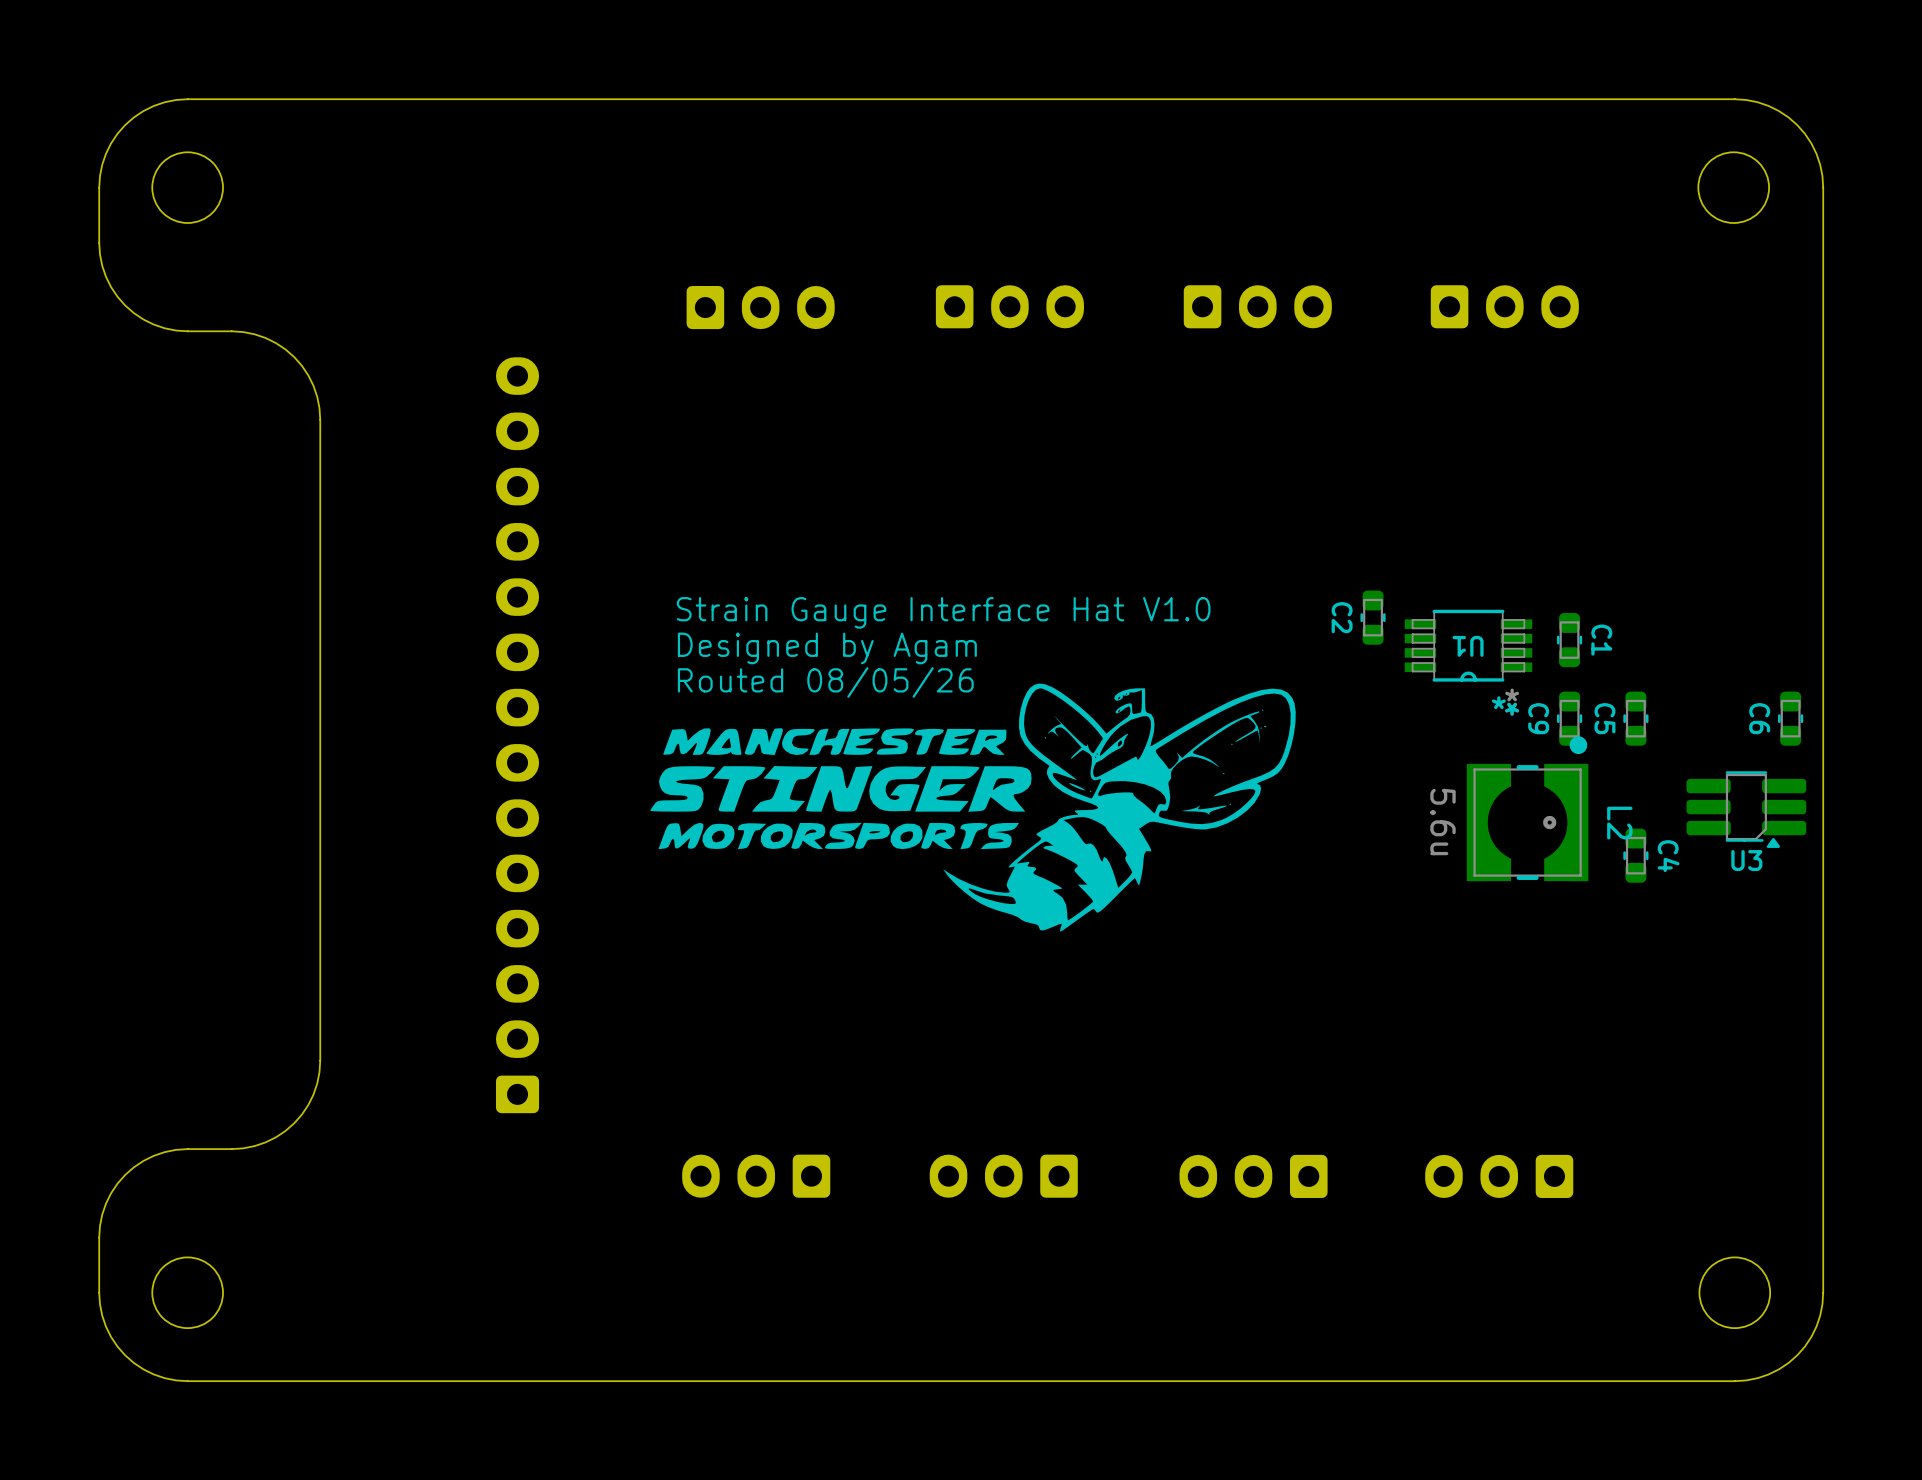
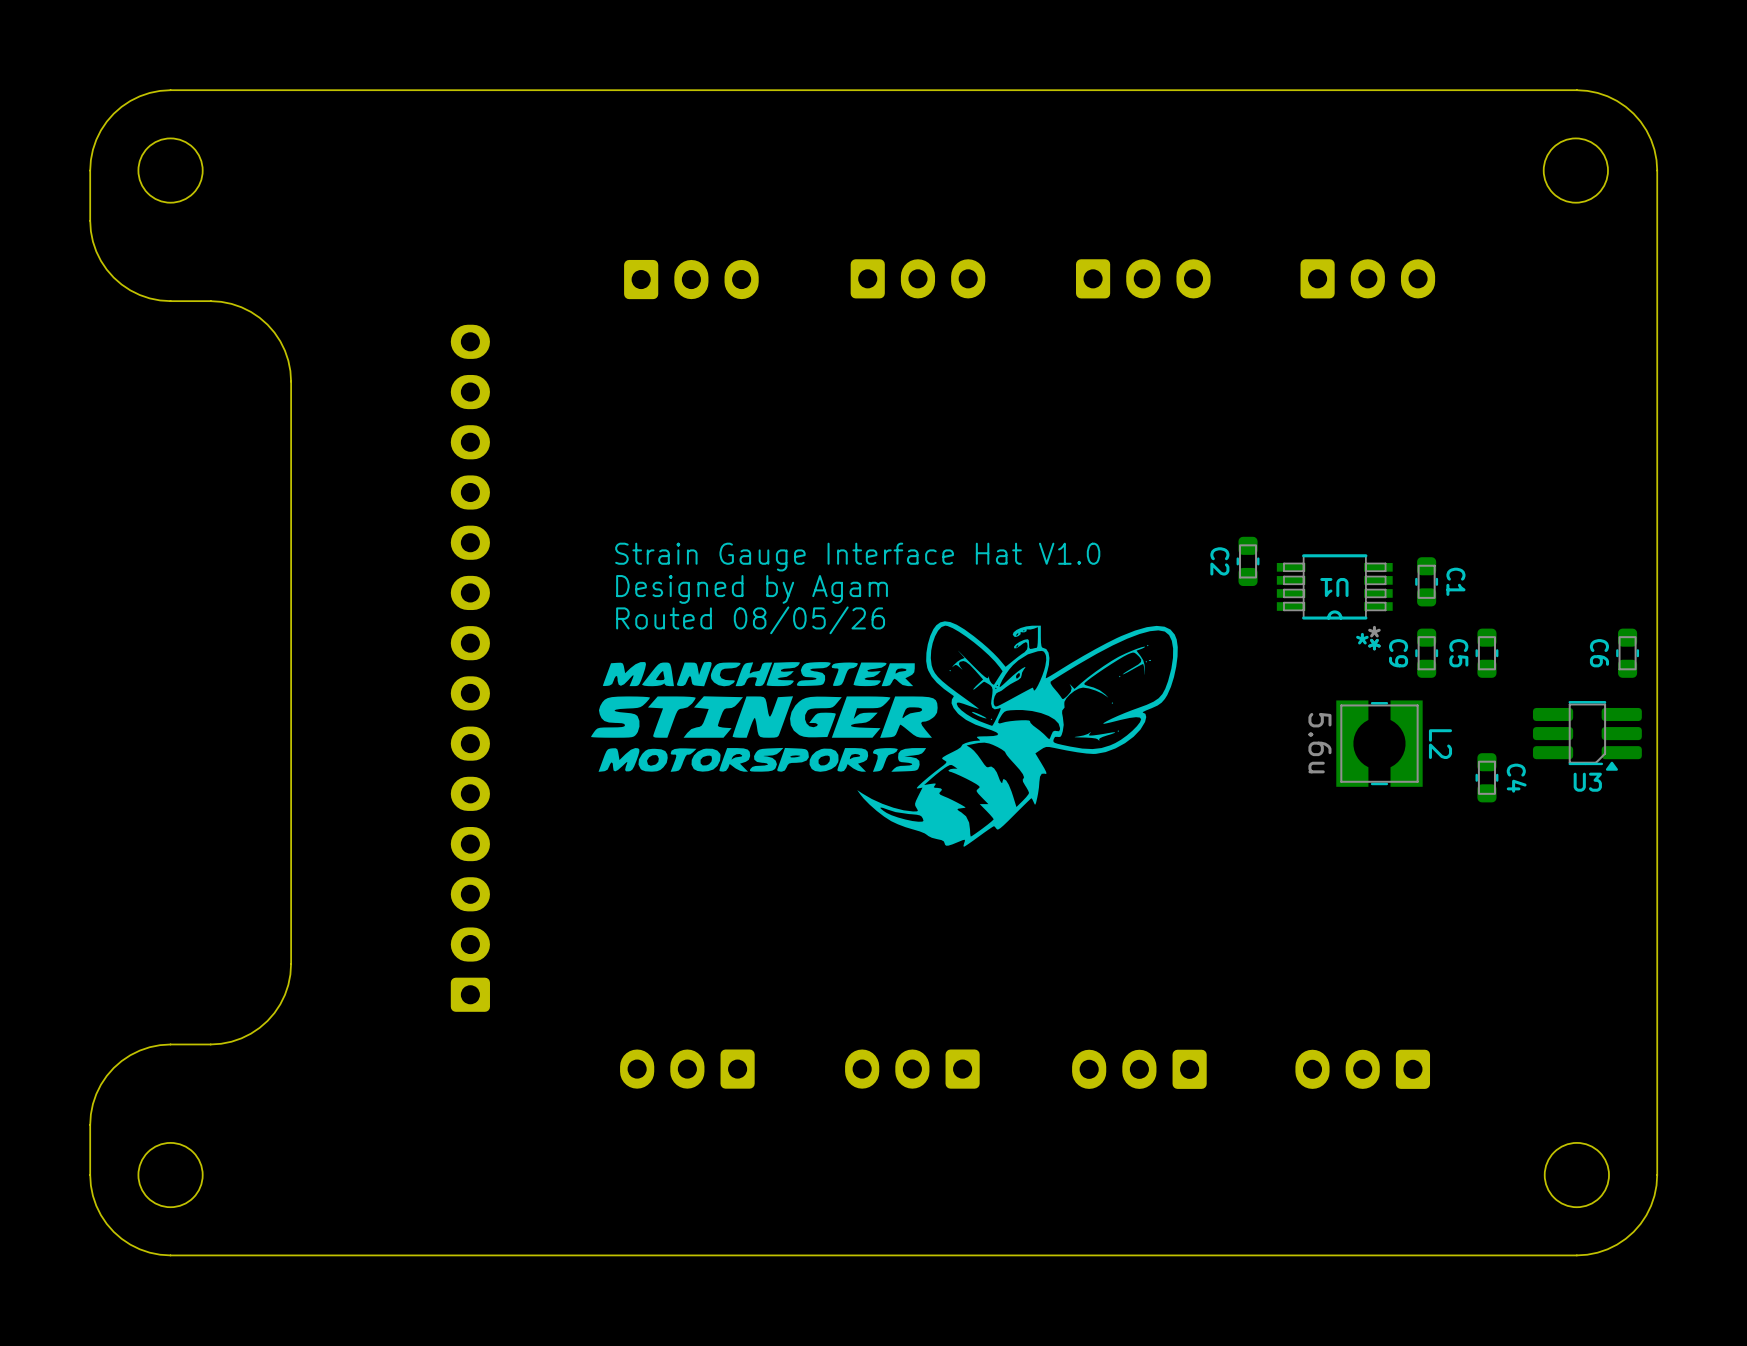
L2 footprint: [1466, 736, 1589, 882] -> [1336, 700, 1423, 787]

